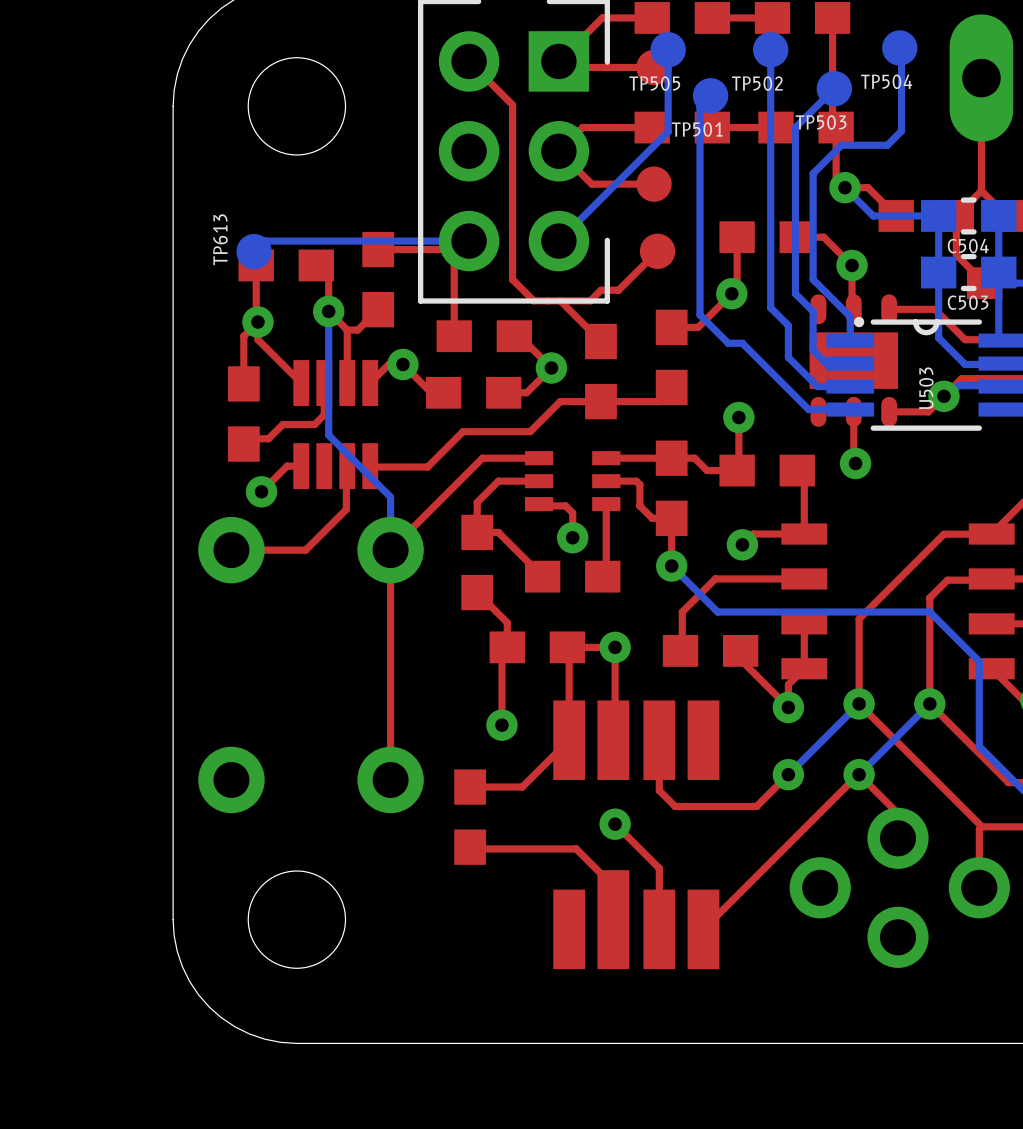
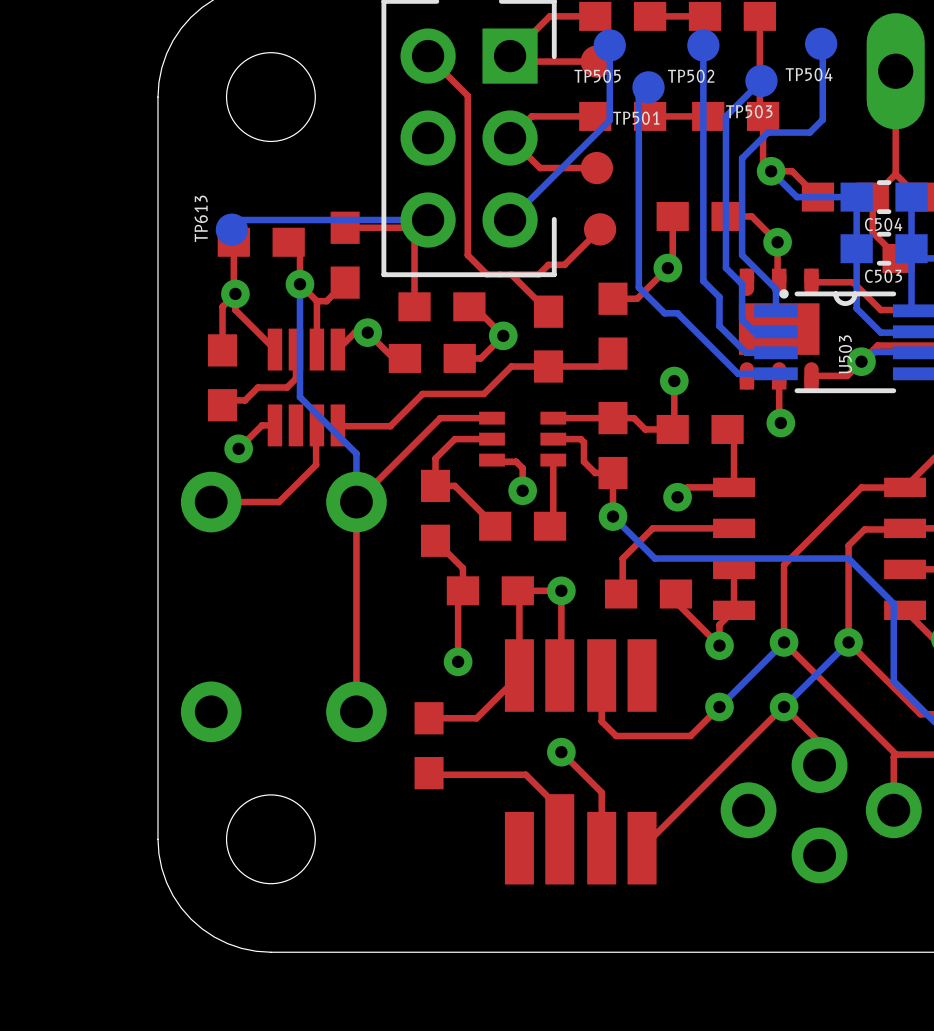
part footprint: [809, 294, 899, 427] -> [738, 268, 820, 390]

